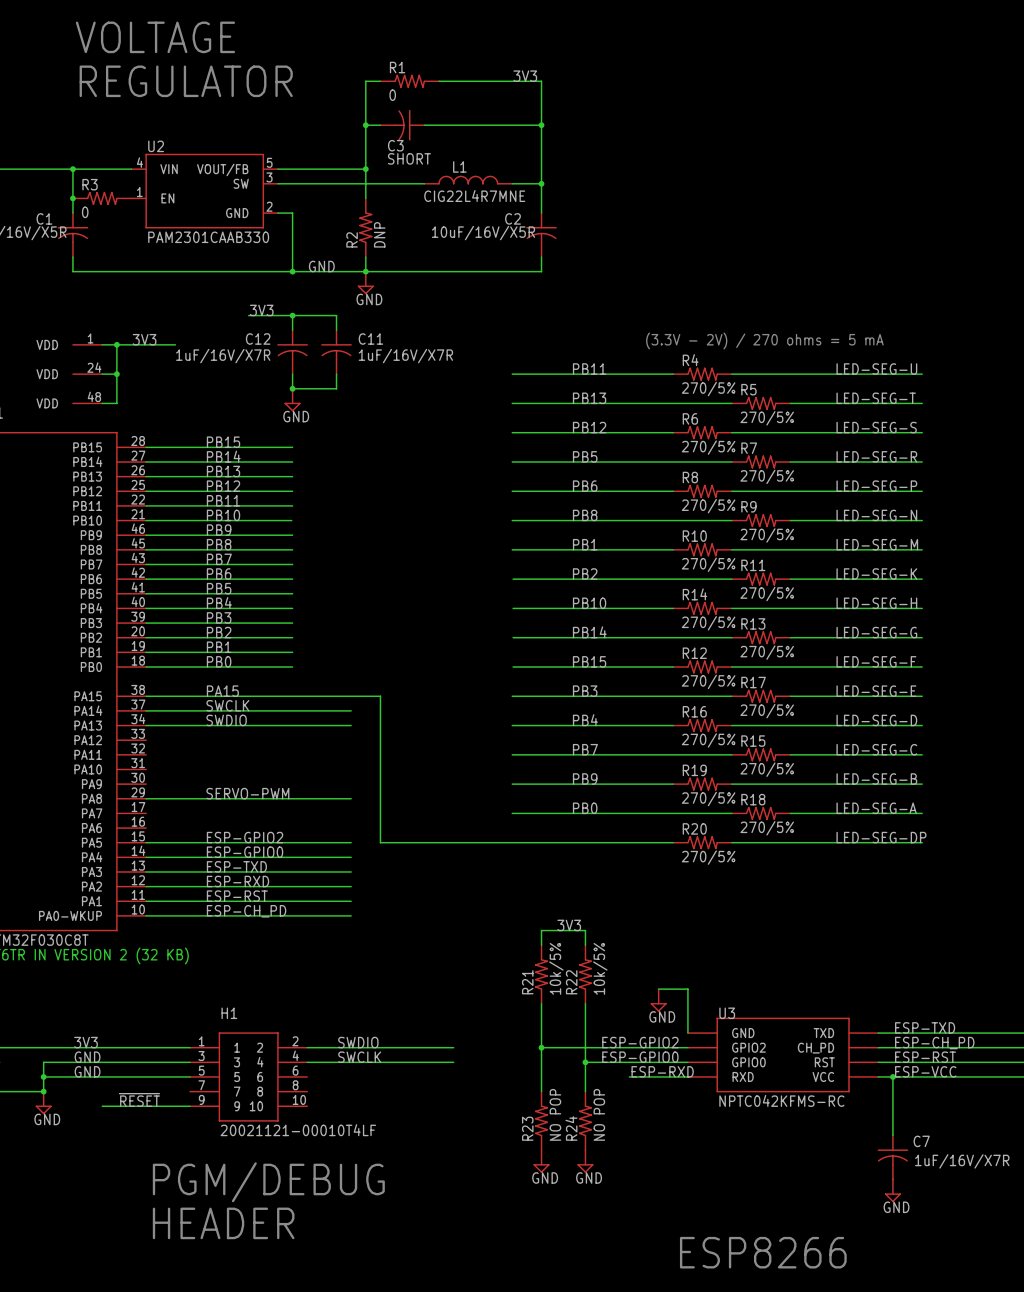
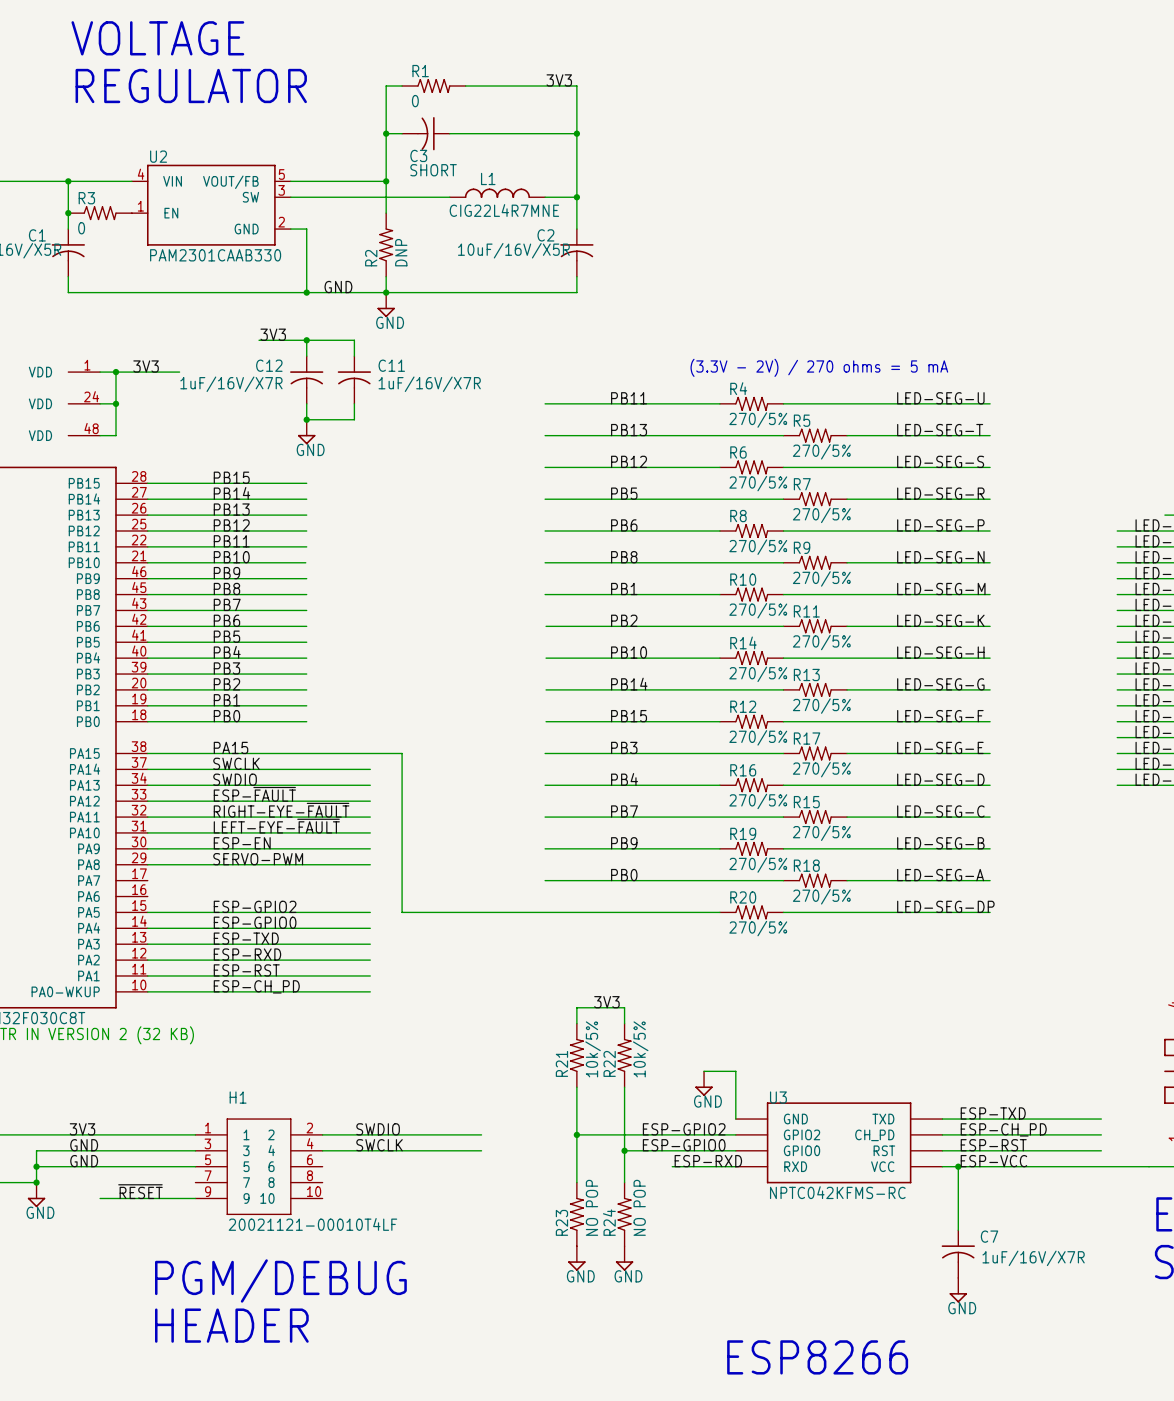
label: none -> ESP-~{FAULT} (254, 794)
wire: none -> (147, 801) (370, 801)
label: none -> RIGHT-EYE-~{FAULT} (281, 810)
wire: none -> (147, 817) (370, 817)
label: none -> LEFT-EYE-~{FAULT} (276, 826)
wire: none -> (147, 832) (370, 832)
label: none -> ESP-EN (242, 843)
wire: none -> (147, 848) (370, 848)

